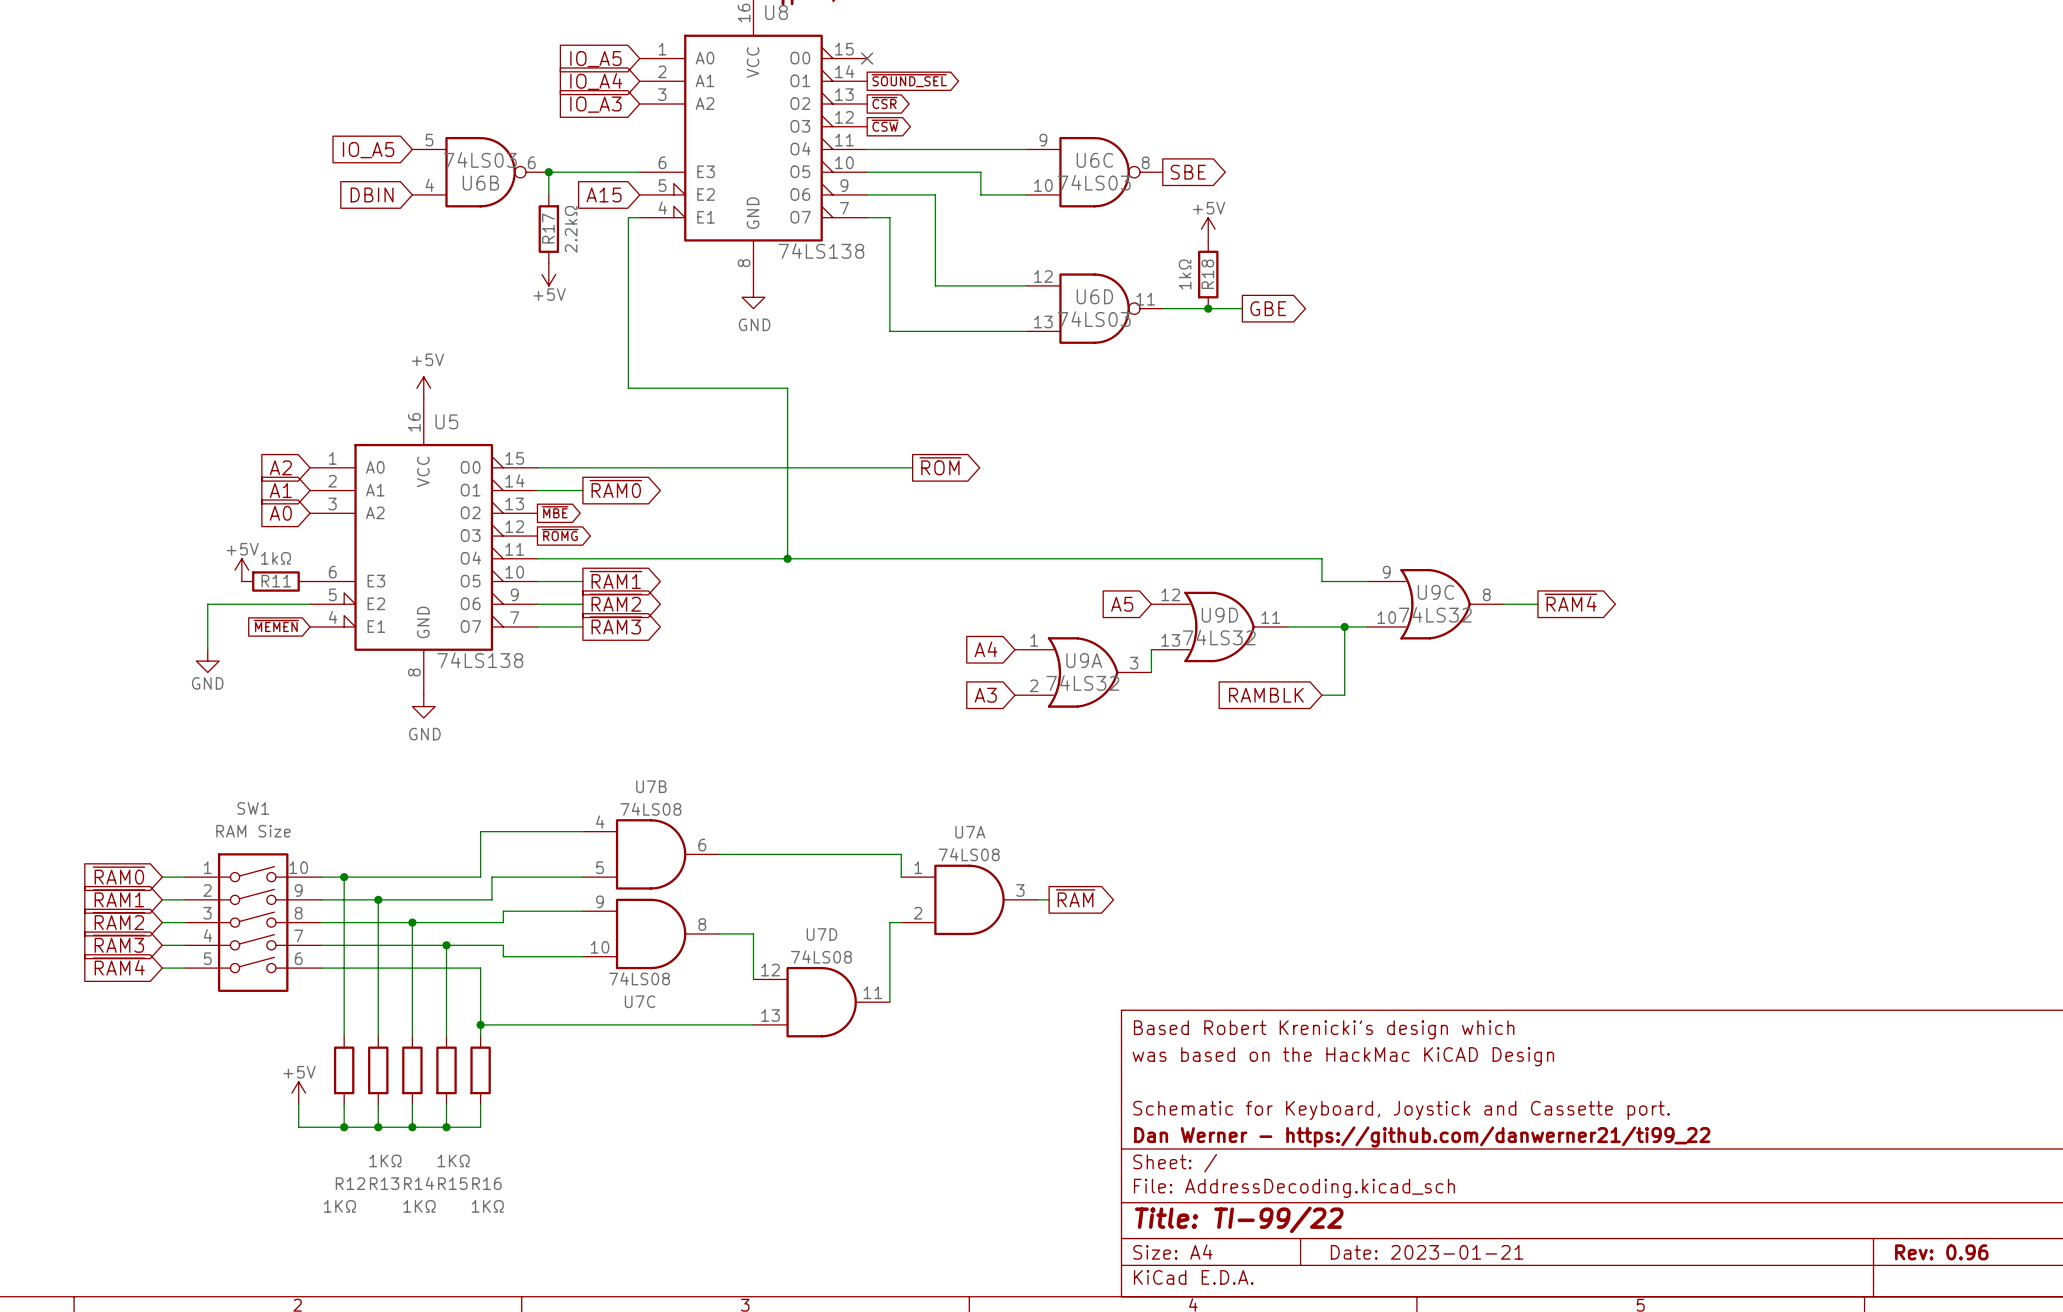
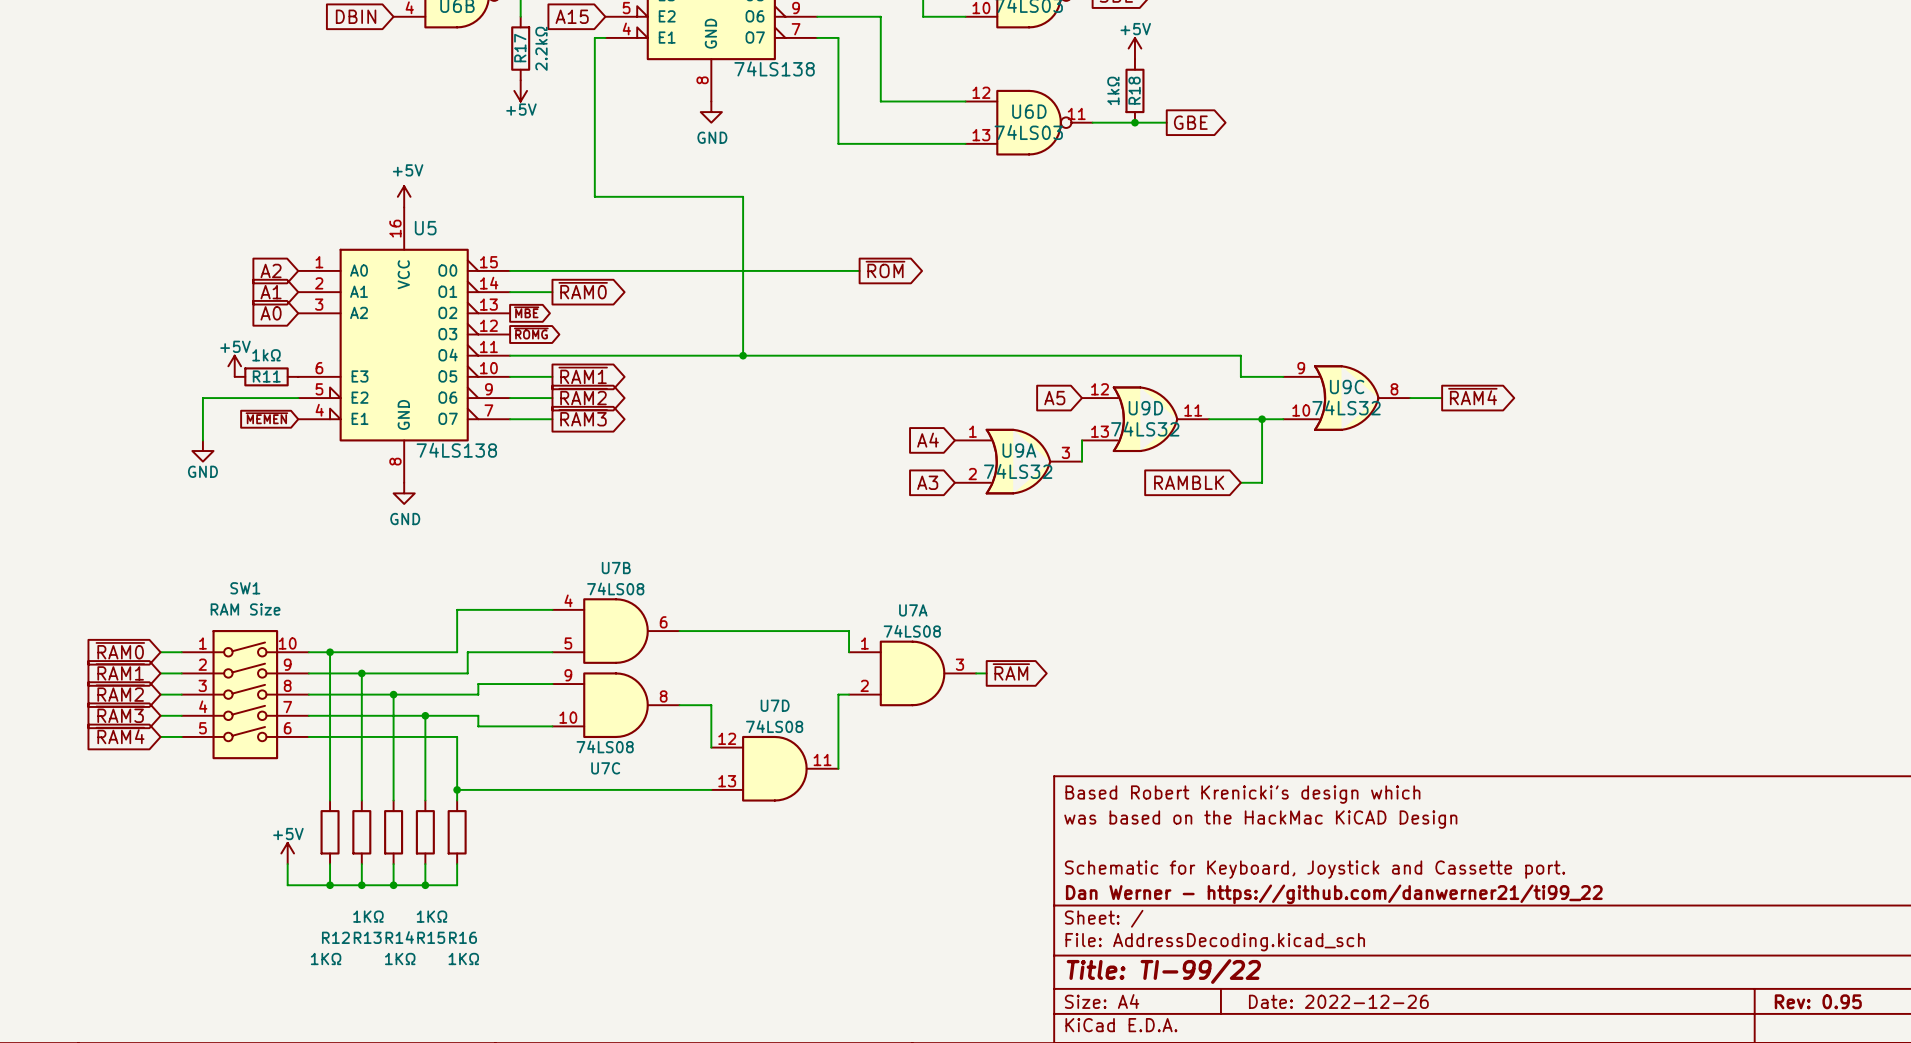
title block: Date: 2023-01-21 (1427, 1252) -> Date: 2022-12-26 (1338, 1001)
title block: Rev: 0.96 (1941, 1252) -> Rev: 0.95 (1818, 1001)

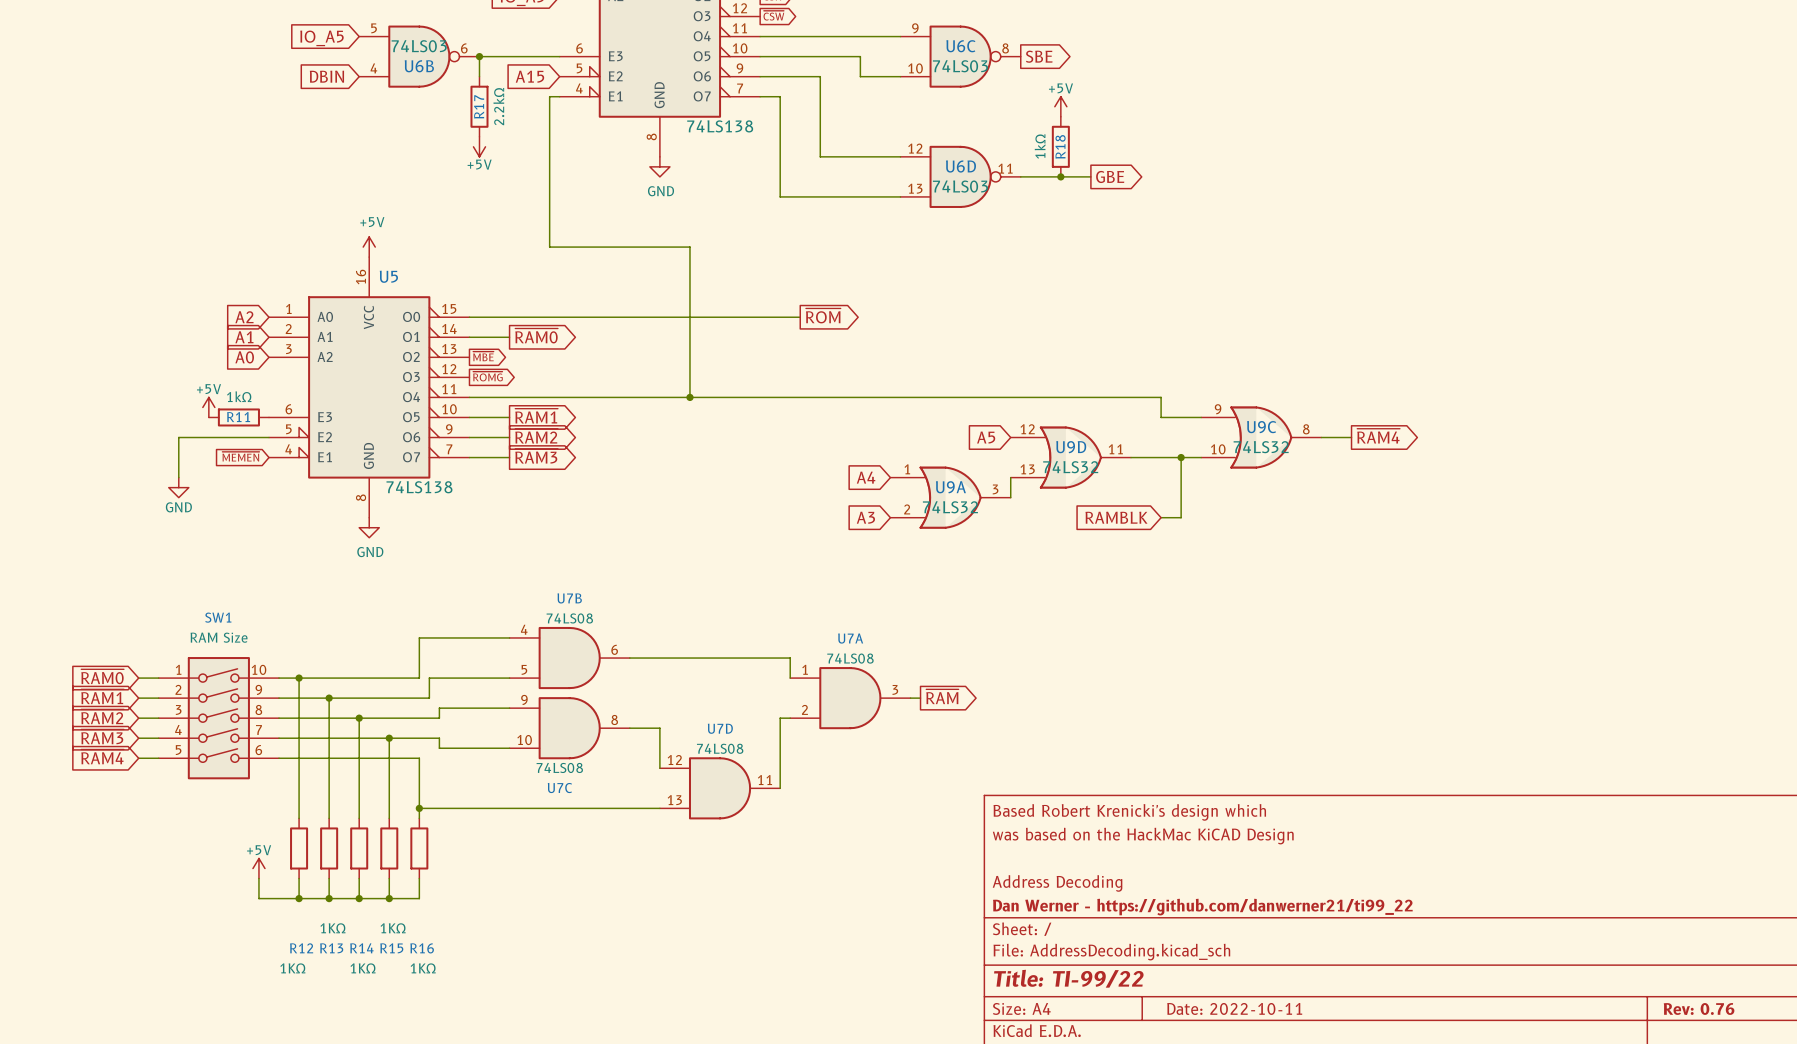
title block: Schematic for Keyboard, Joystick and Cassette port. (1315, 869) -> Address Decoding (1057, 883)
title block: Date: 2022-12-26 (1338, 1001) -> Date: 2022-10-11 (1234, 1008)
title block: Rev: 0.95 (1818, 1001) -> Rev: 0.76 (1699, 1009)

